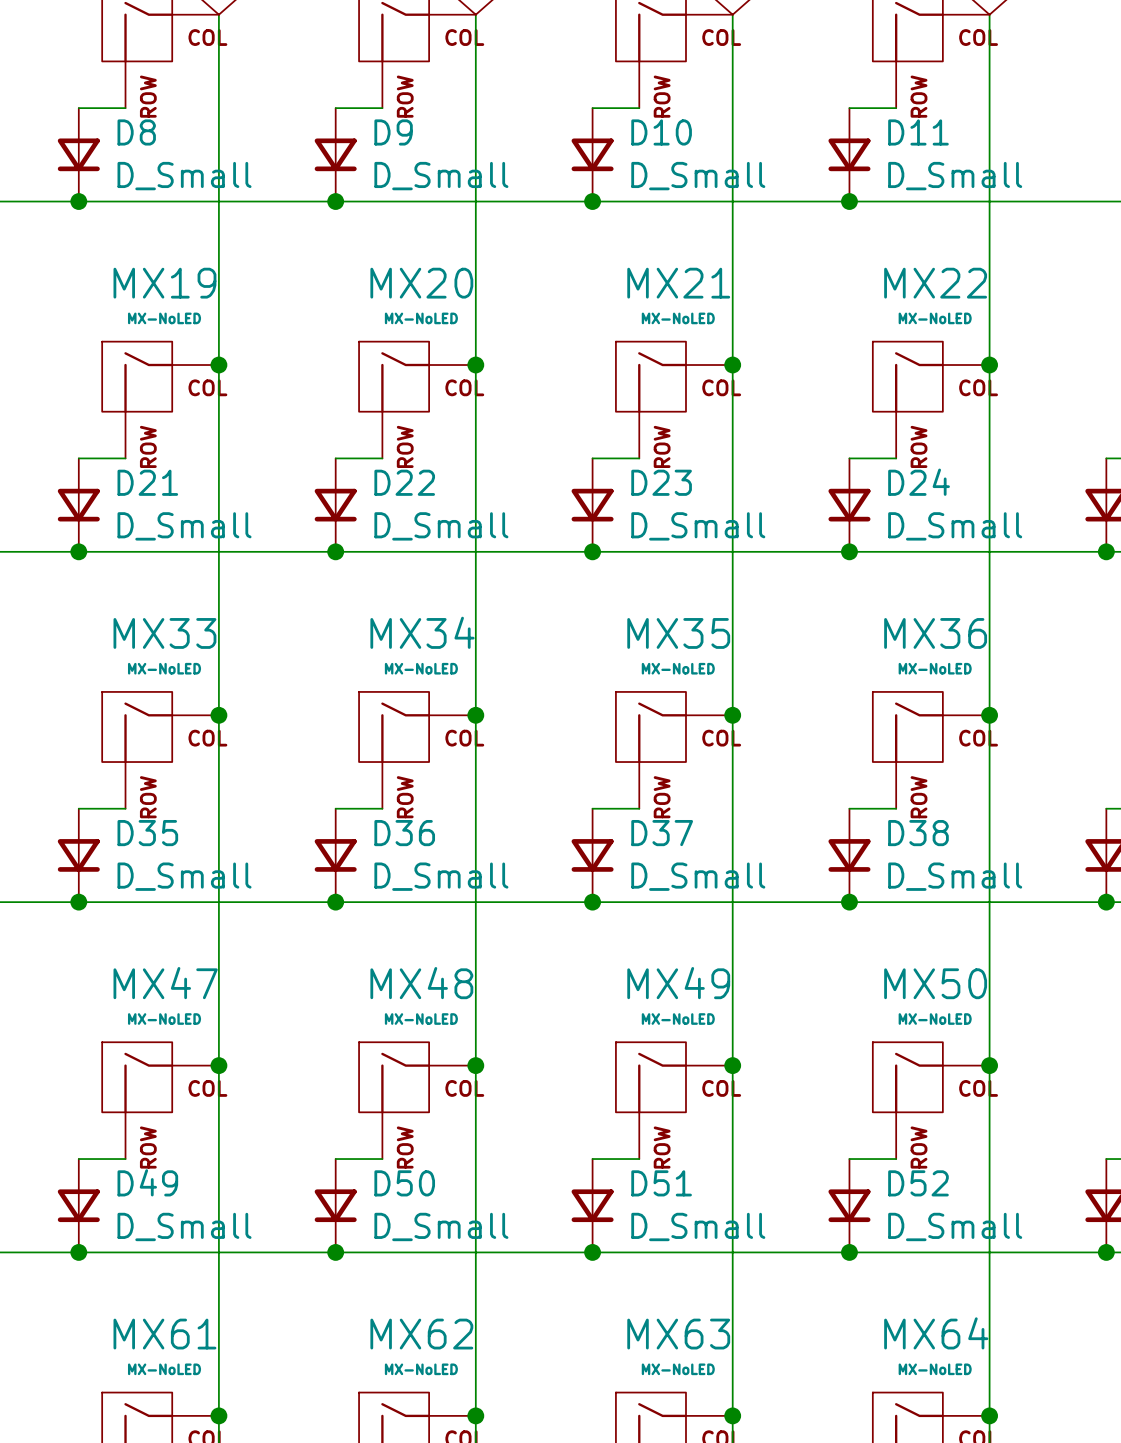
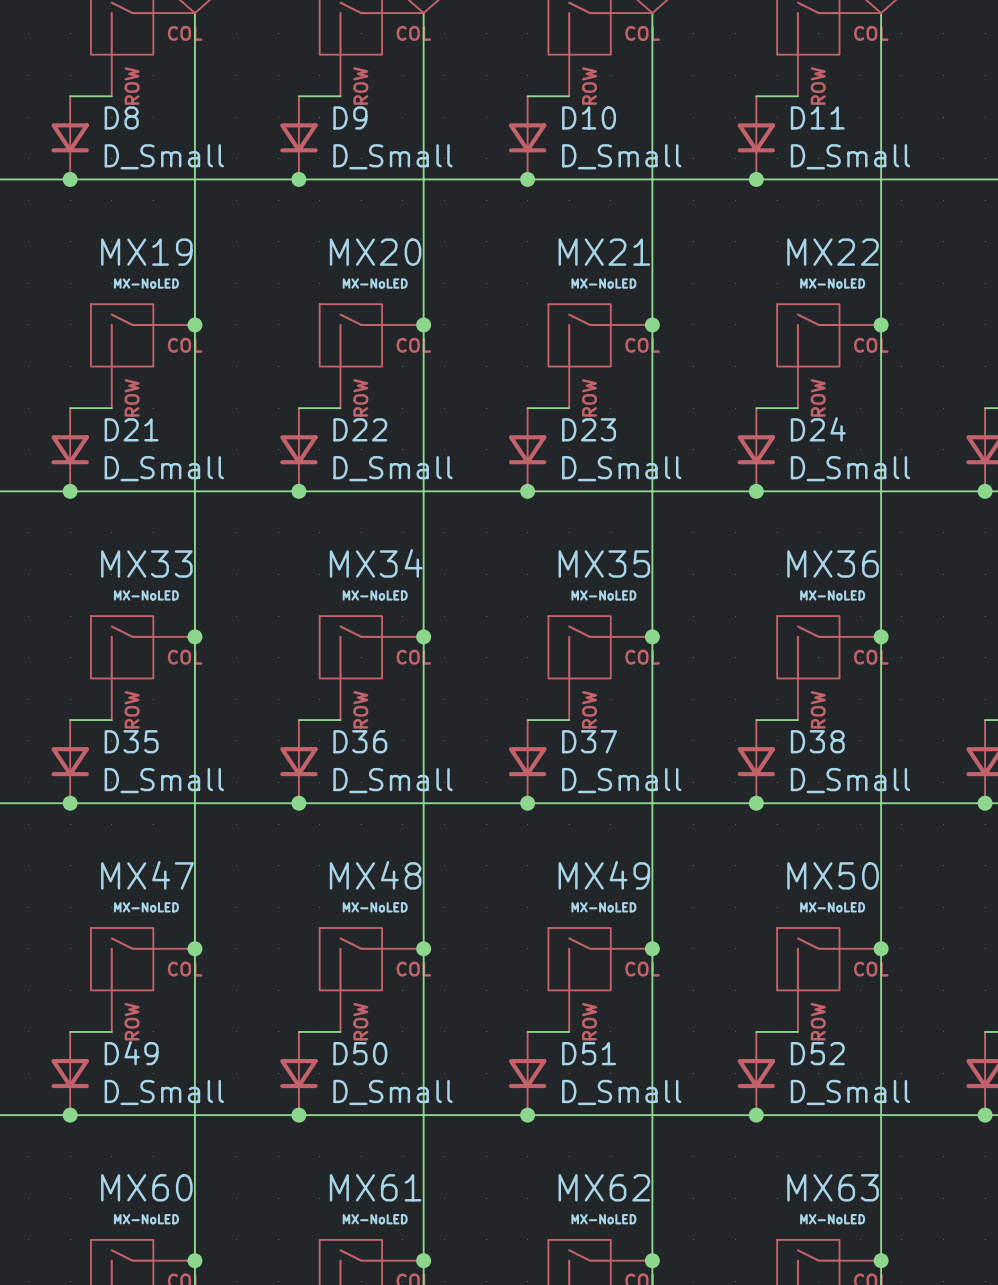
MX64 name: MX64 (936, 1333) -> MX63 (833, 1187)
MX61 name: MX61 (164, 1334) -> MX60 (146, 1187)
MX62 name: MX62 (421, 1334) -> MX61 (375, 1187)
MX63 name: MX63 (678, 1334) -> MX62 (604, 1187)

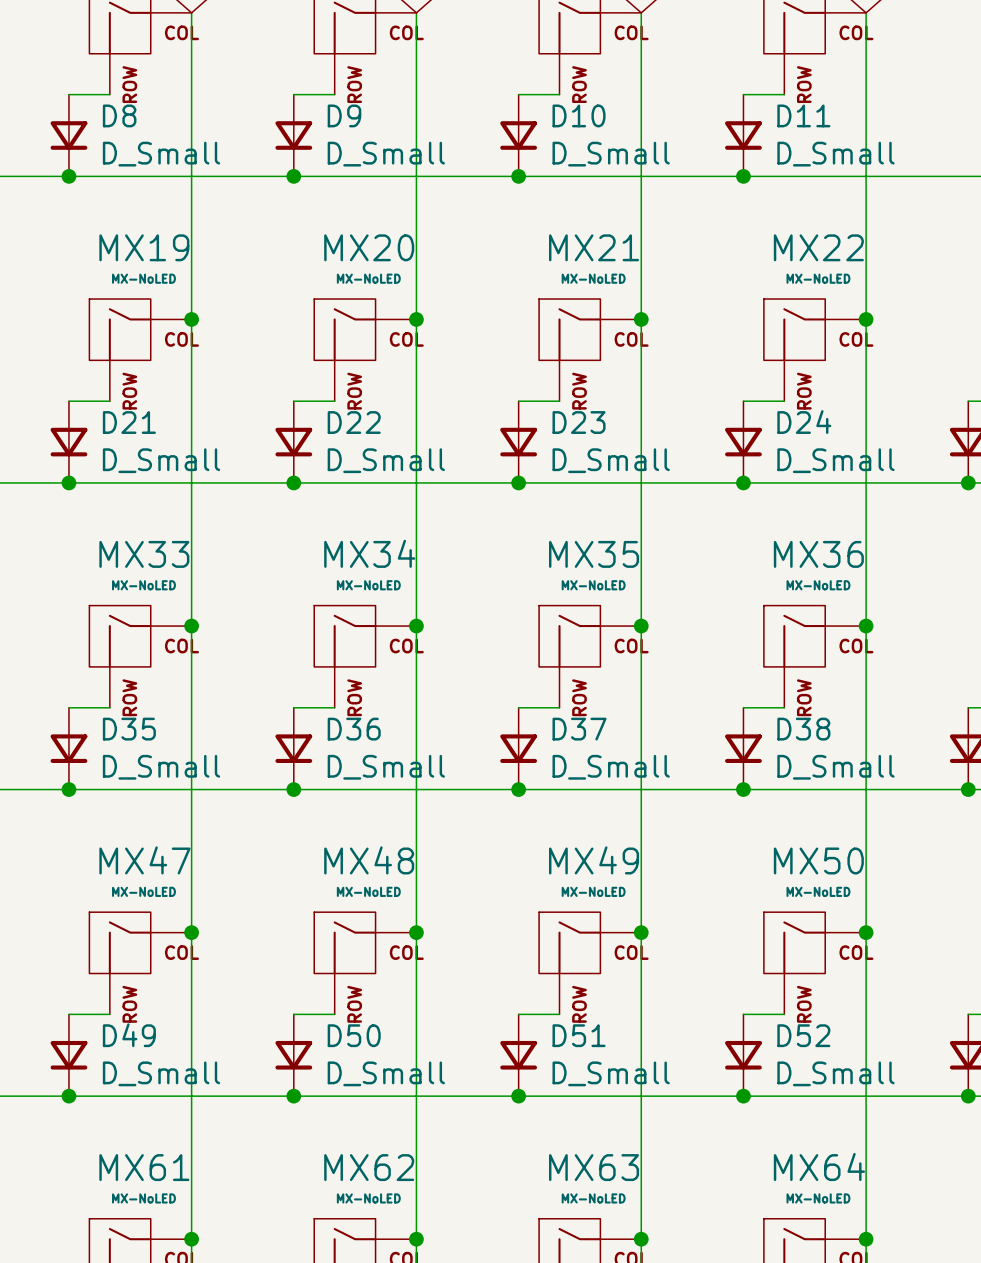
MX60 name: MX60 (146, 1187) -> MX61 (144, 1167)
MX61 name: MX61 (375, 1187) -> MX62 (369, 1167)
MX62 name: MX62 (604, 1187) -> MX63 (594, 1167)
MX63 name: MX63 (833, 1187) -> MX64 (819, 1166)

